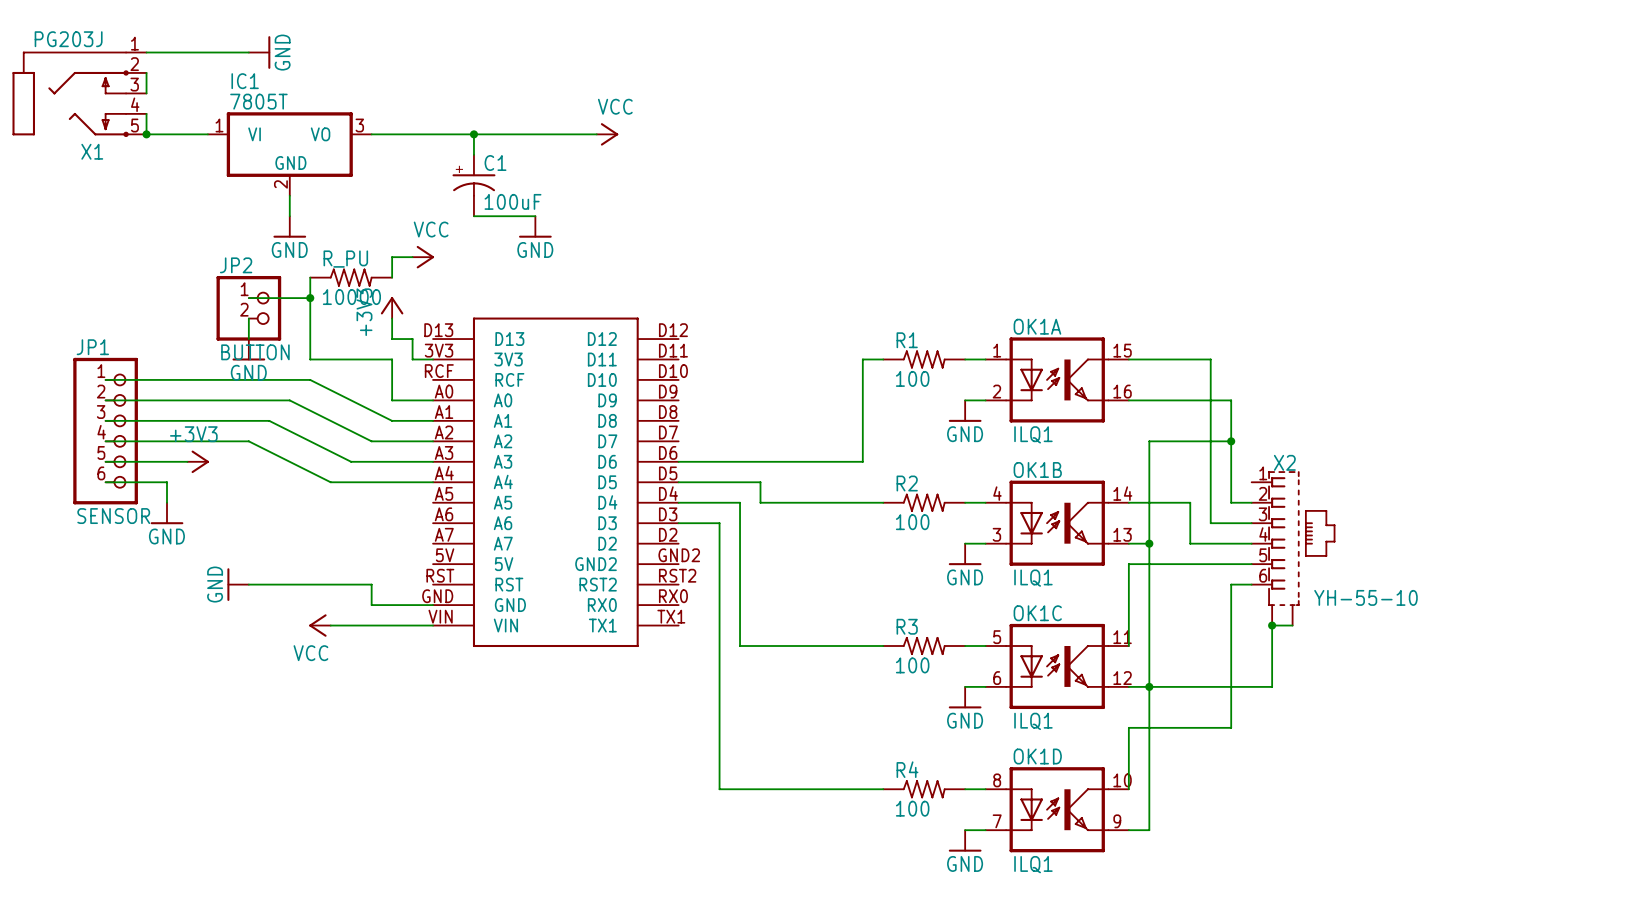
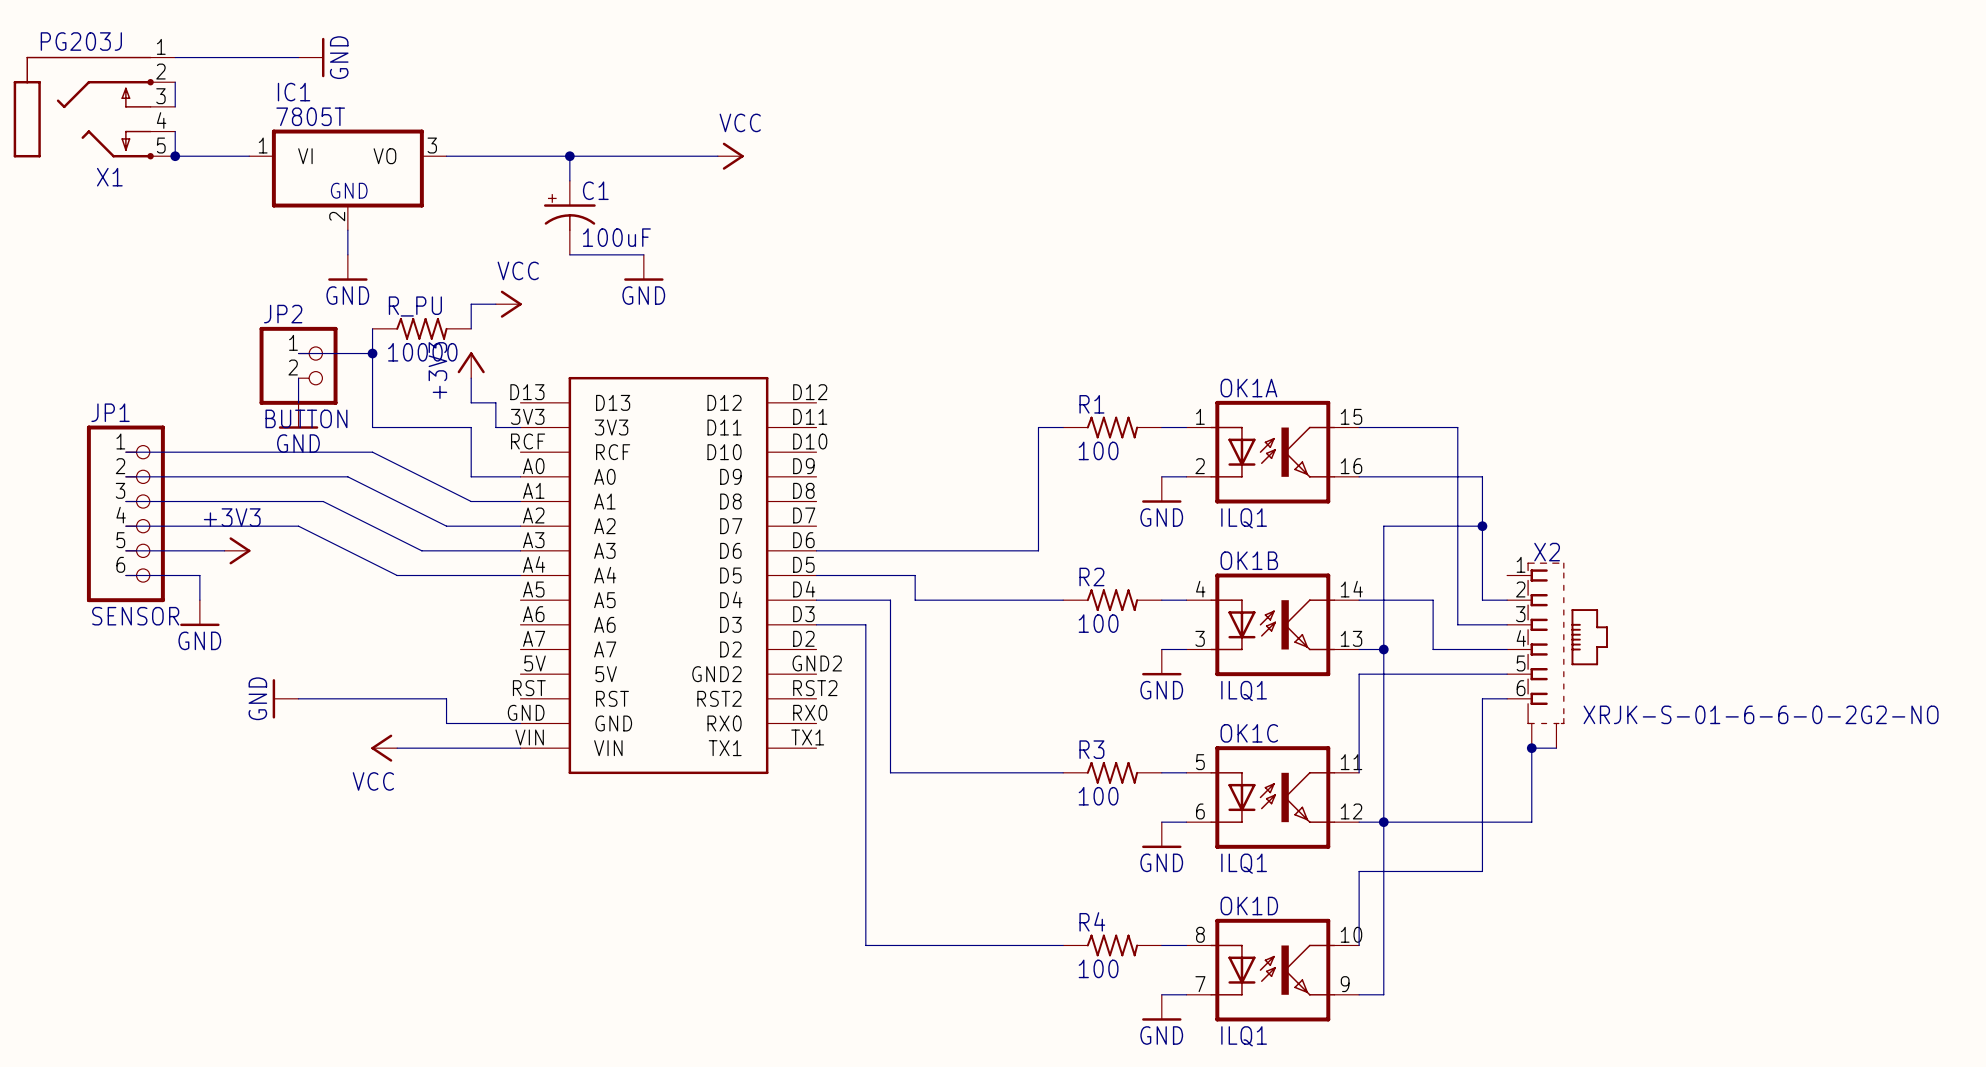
X2 value: YH-55-10 (1365, 597) -> XRJK-S-01-6-6-0-2G2-NO (1761, 714)

